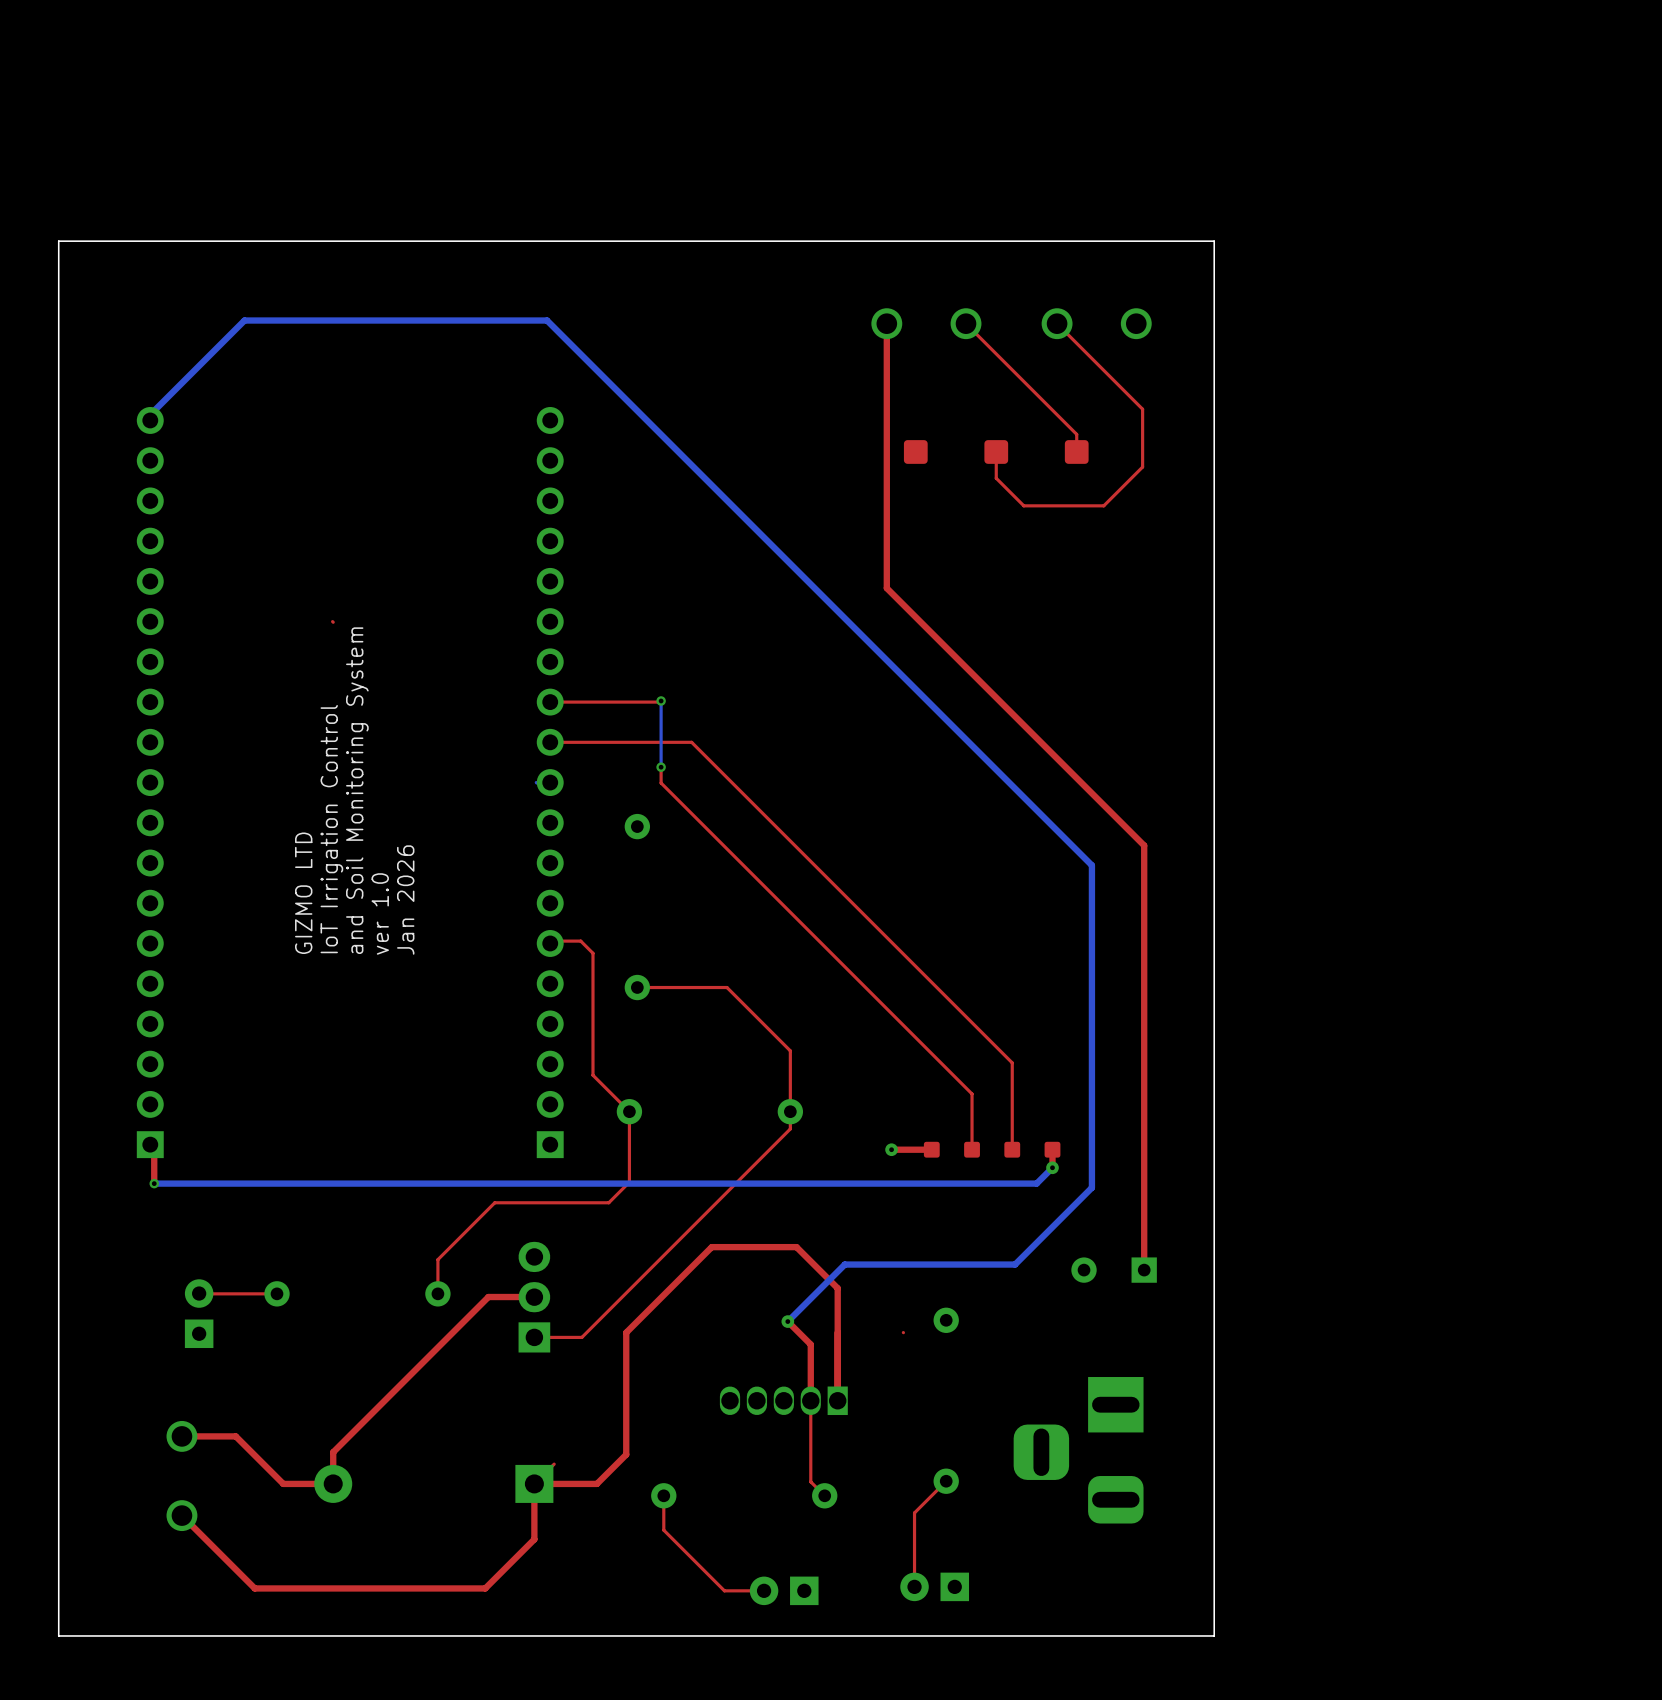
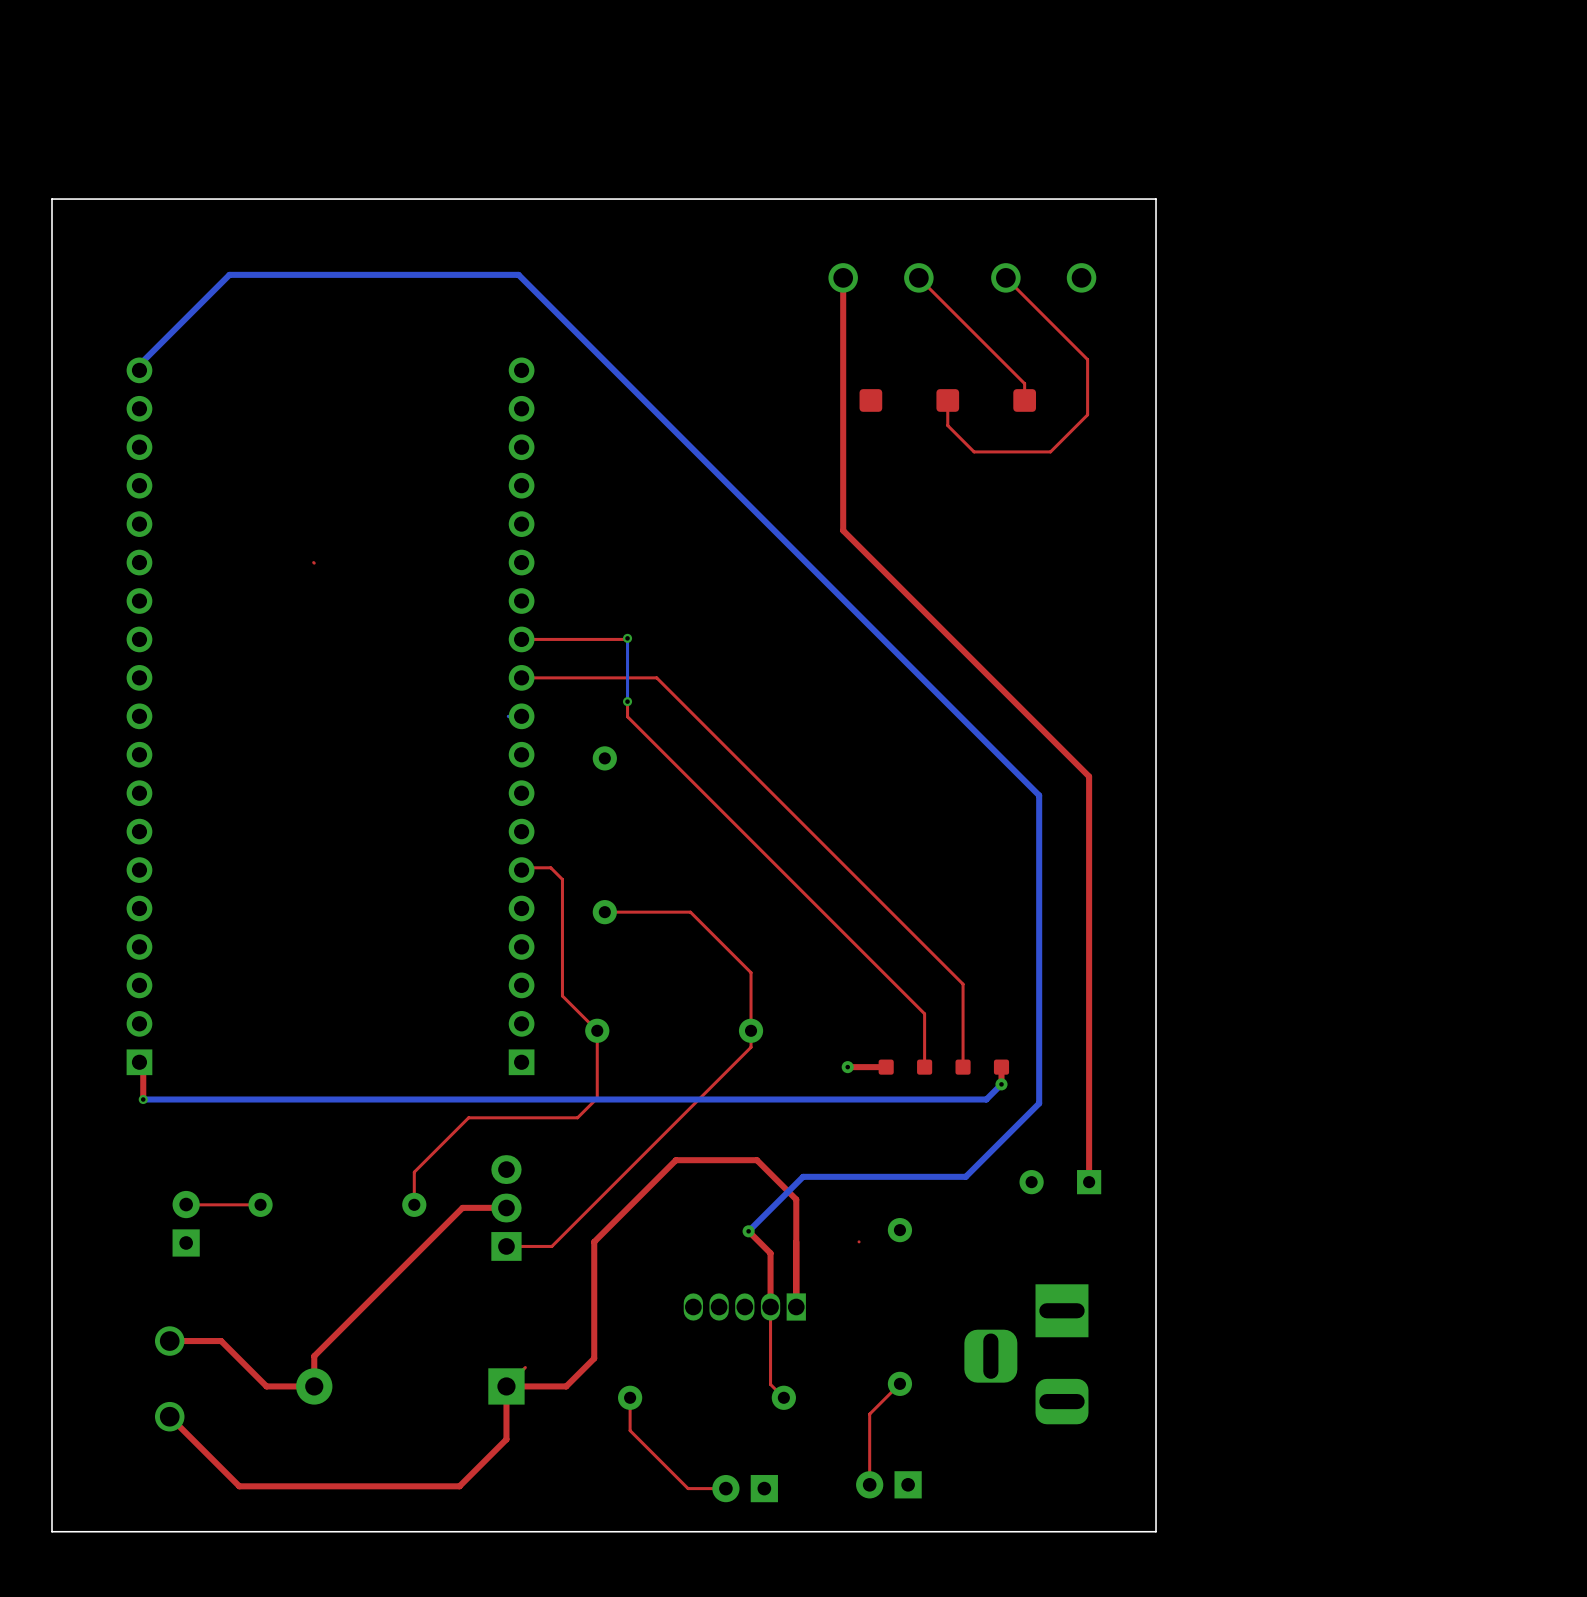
text: and Soil Monitoring System (357, 790) -> none
text: IoT Irrigation Control (331, 829) -> none
text: GIZMO LTD (303, 893) -> none
text: Jan 2026 (405, 900) -> none
text: ver 1.0 (380, 913) -> none

